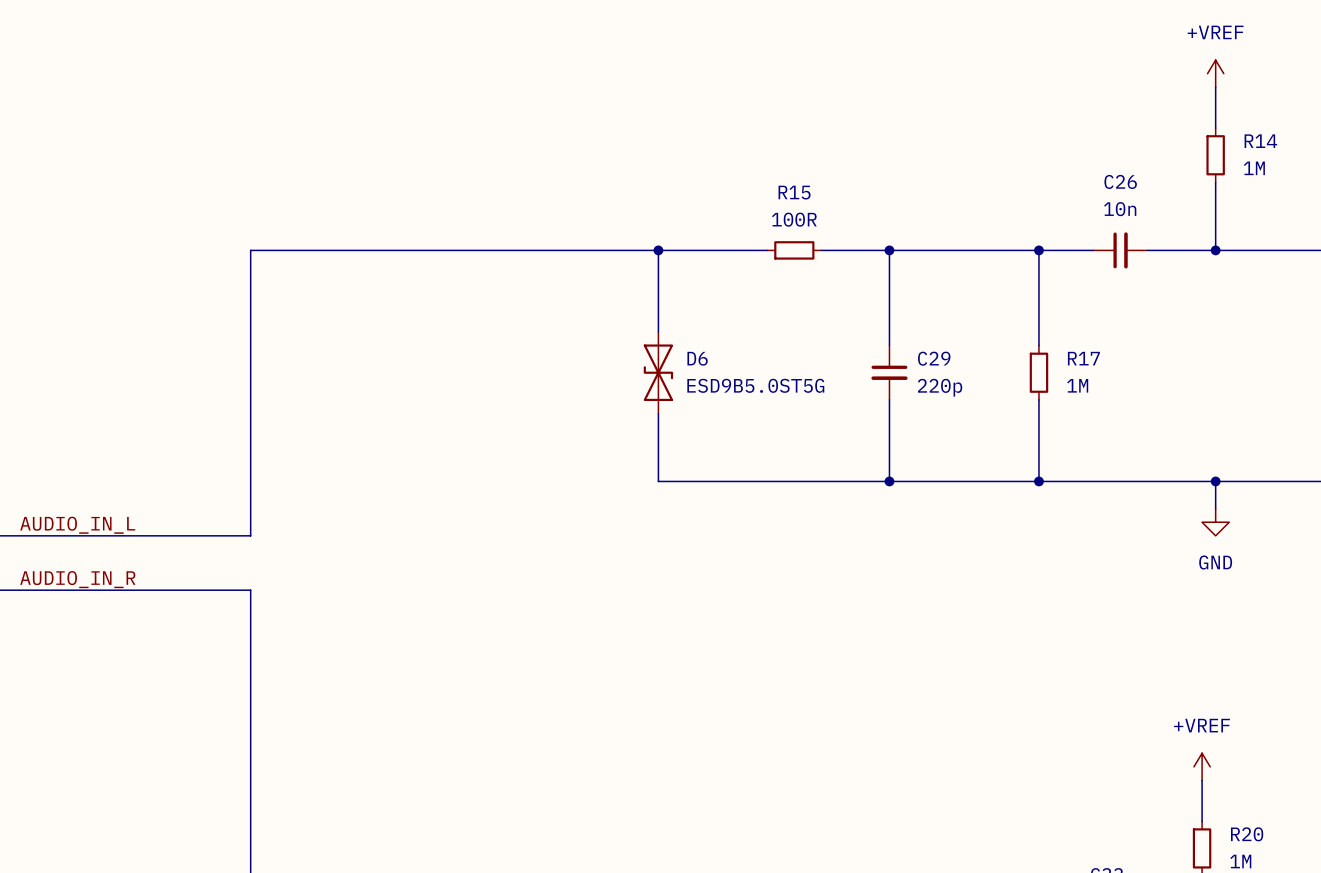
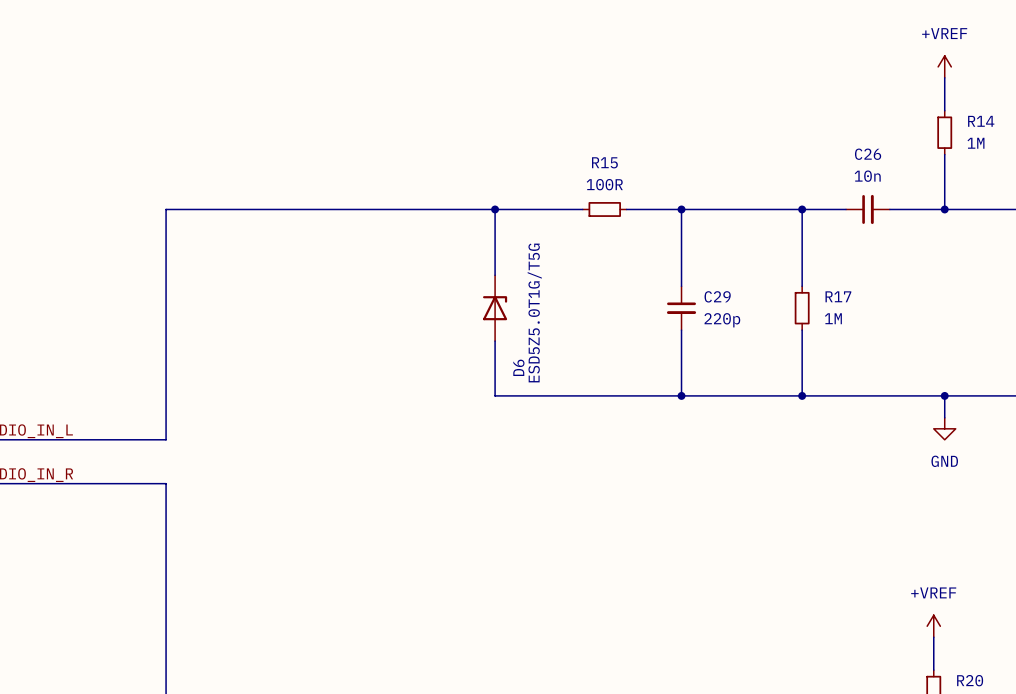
D6 symbol: [643, 331, 674, 414] -> [483, 275, 508, 342]
D6 name position: D6 (697, 358) -> D6 (518, 367)
D6 value: ESD9B5.0ST5G (755, 385) -> ESD5Z5.0T1G/T5G (534, 312)

